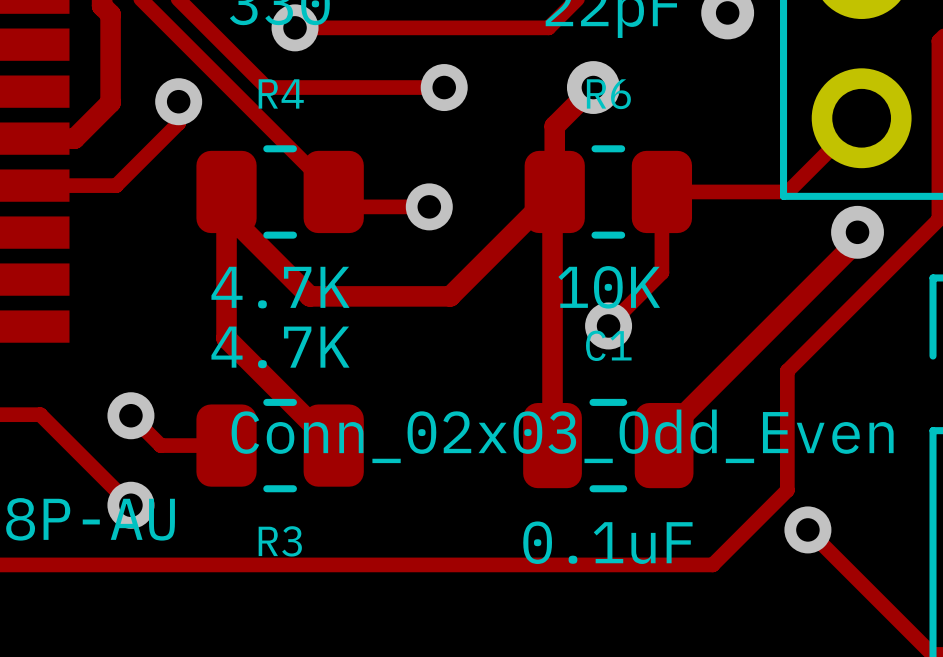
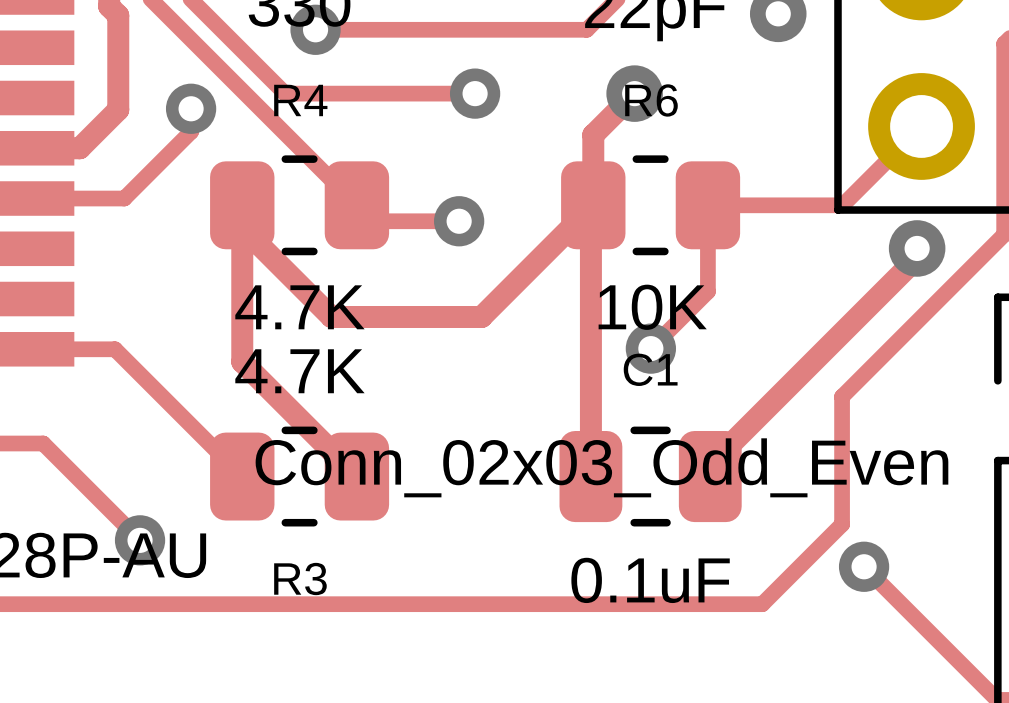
track: (130, 415) (160, 445) (226, 445) -> (27, 349) (115, 349) (242, 476)
via: (130, 415) -> none

